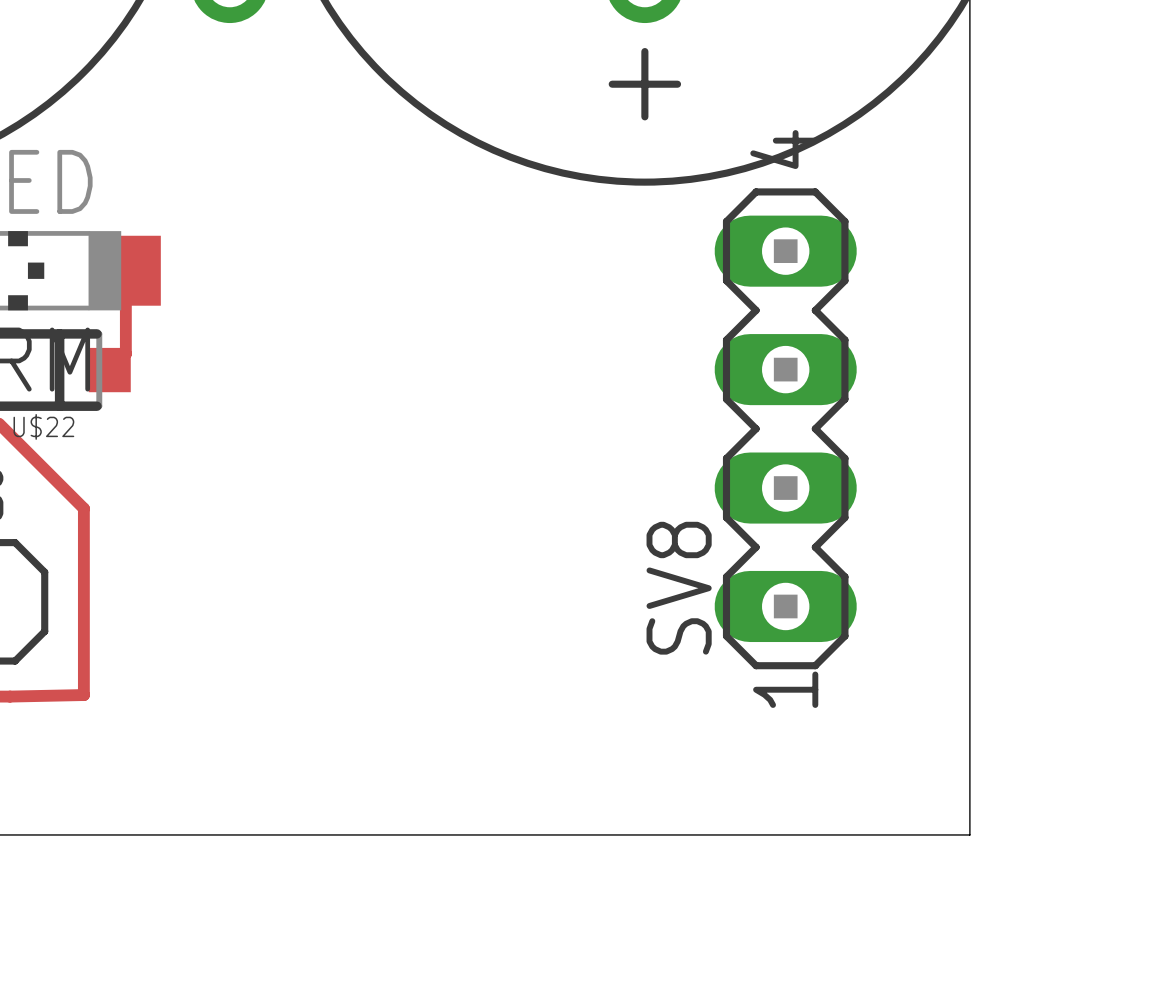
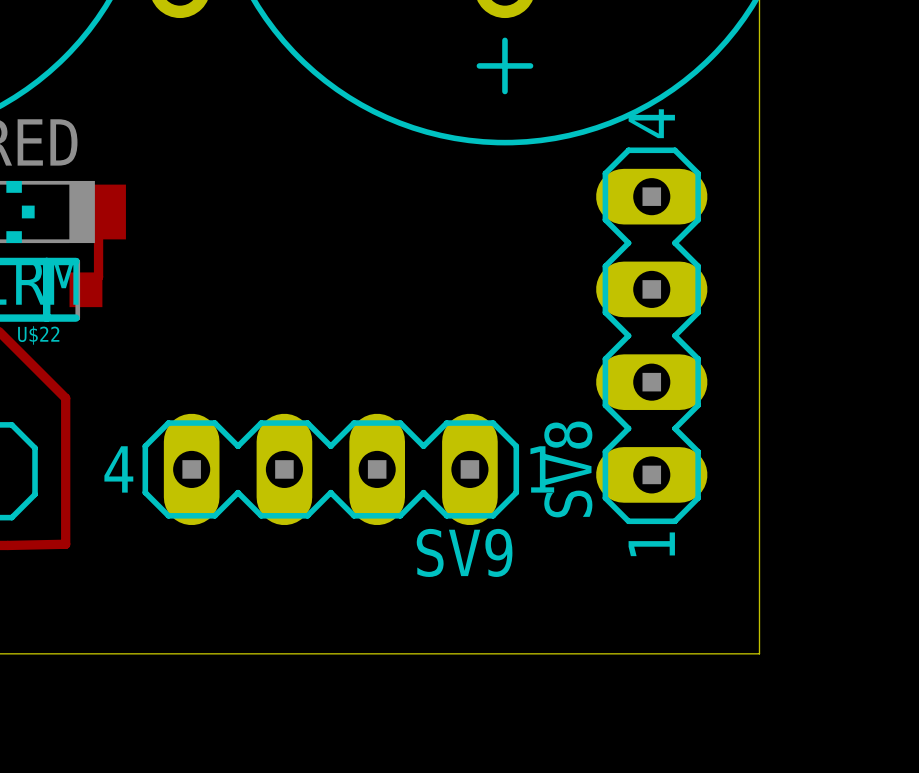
SV8 position: (785, 428) -> (651, 335)
SV9: none -> (330, 469)

